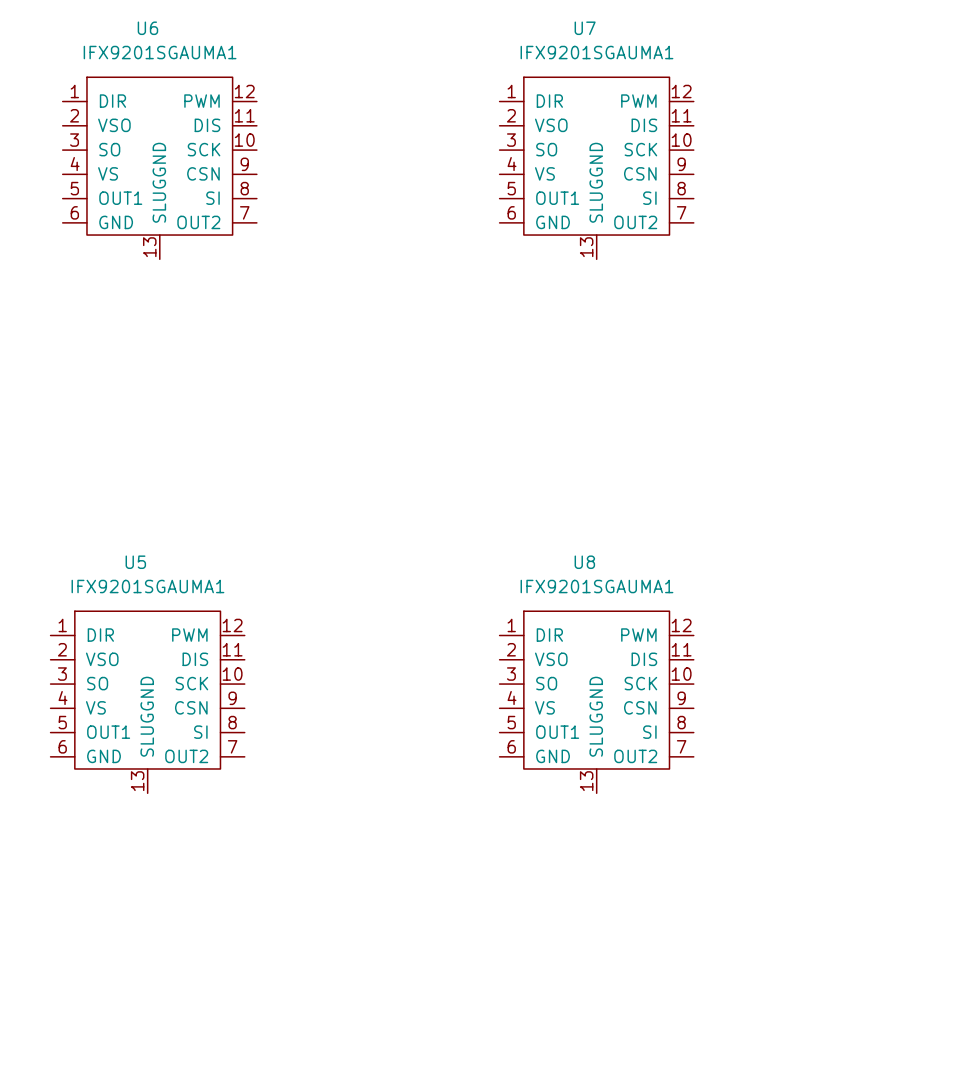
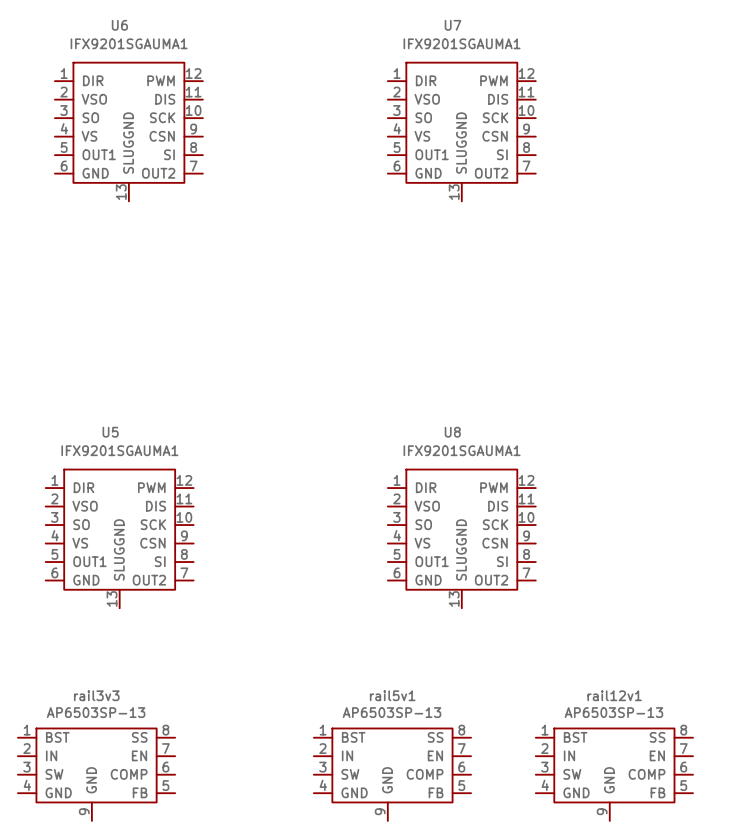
rail3v3: none -> AP6503SP-13 (96, 774)
rail5v1: none -> AP6503SP-13 (392, 774)
rail12v1: none -> AP6503SP-13 (614, 774)

